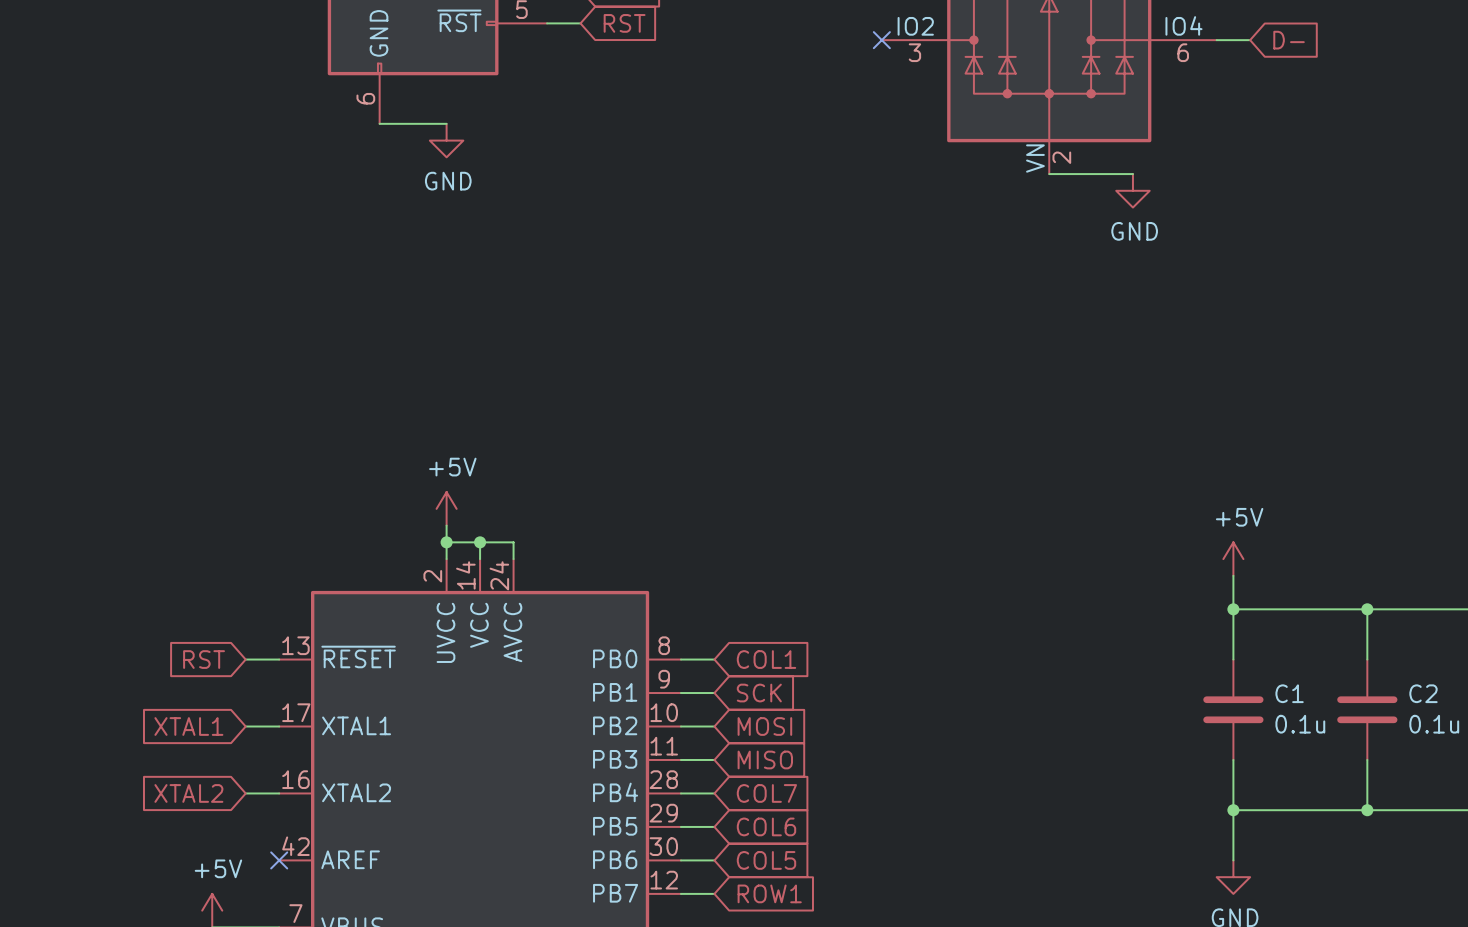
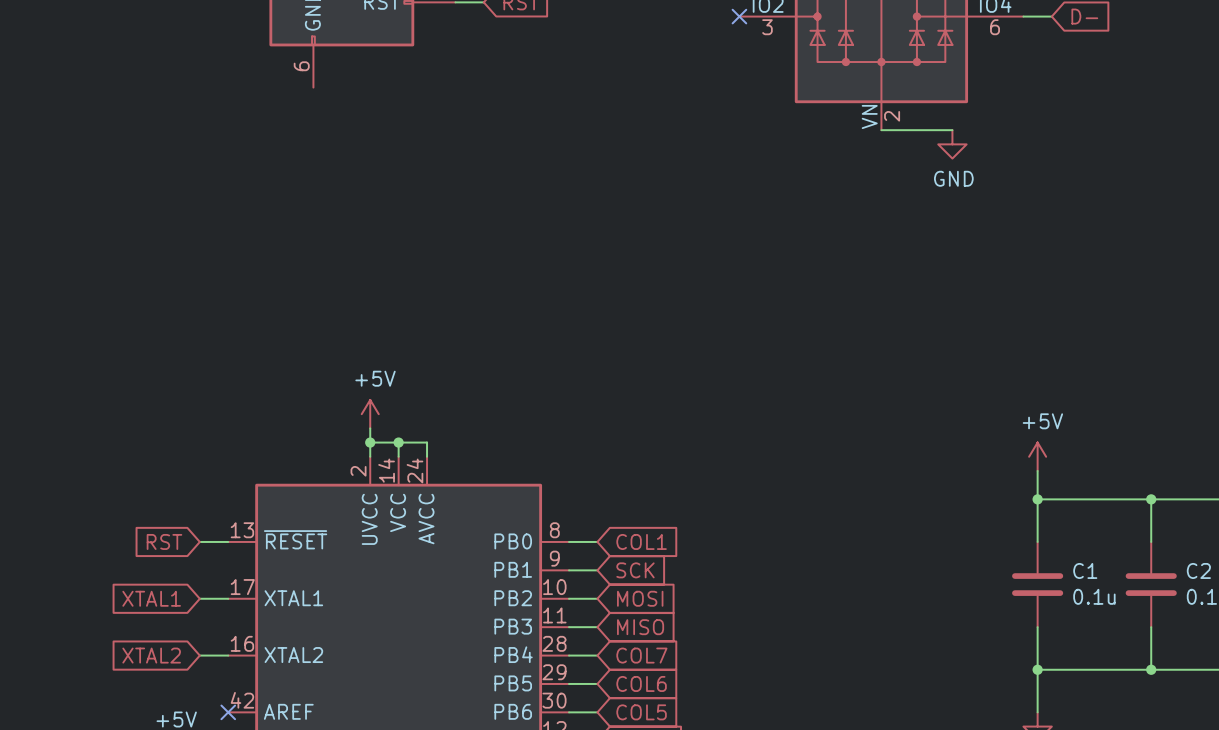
wire: (379, 123) (446, 123) -> none
power symbol: GND (446, 140) -> none

